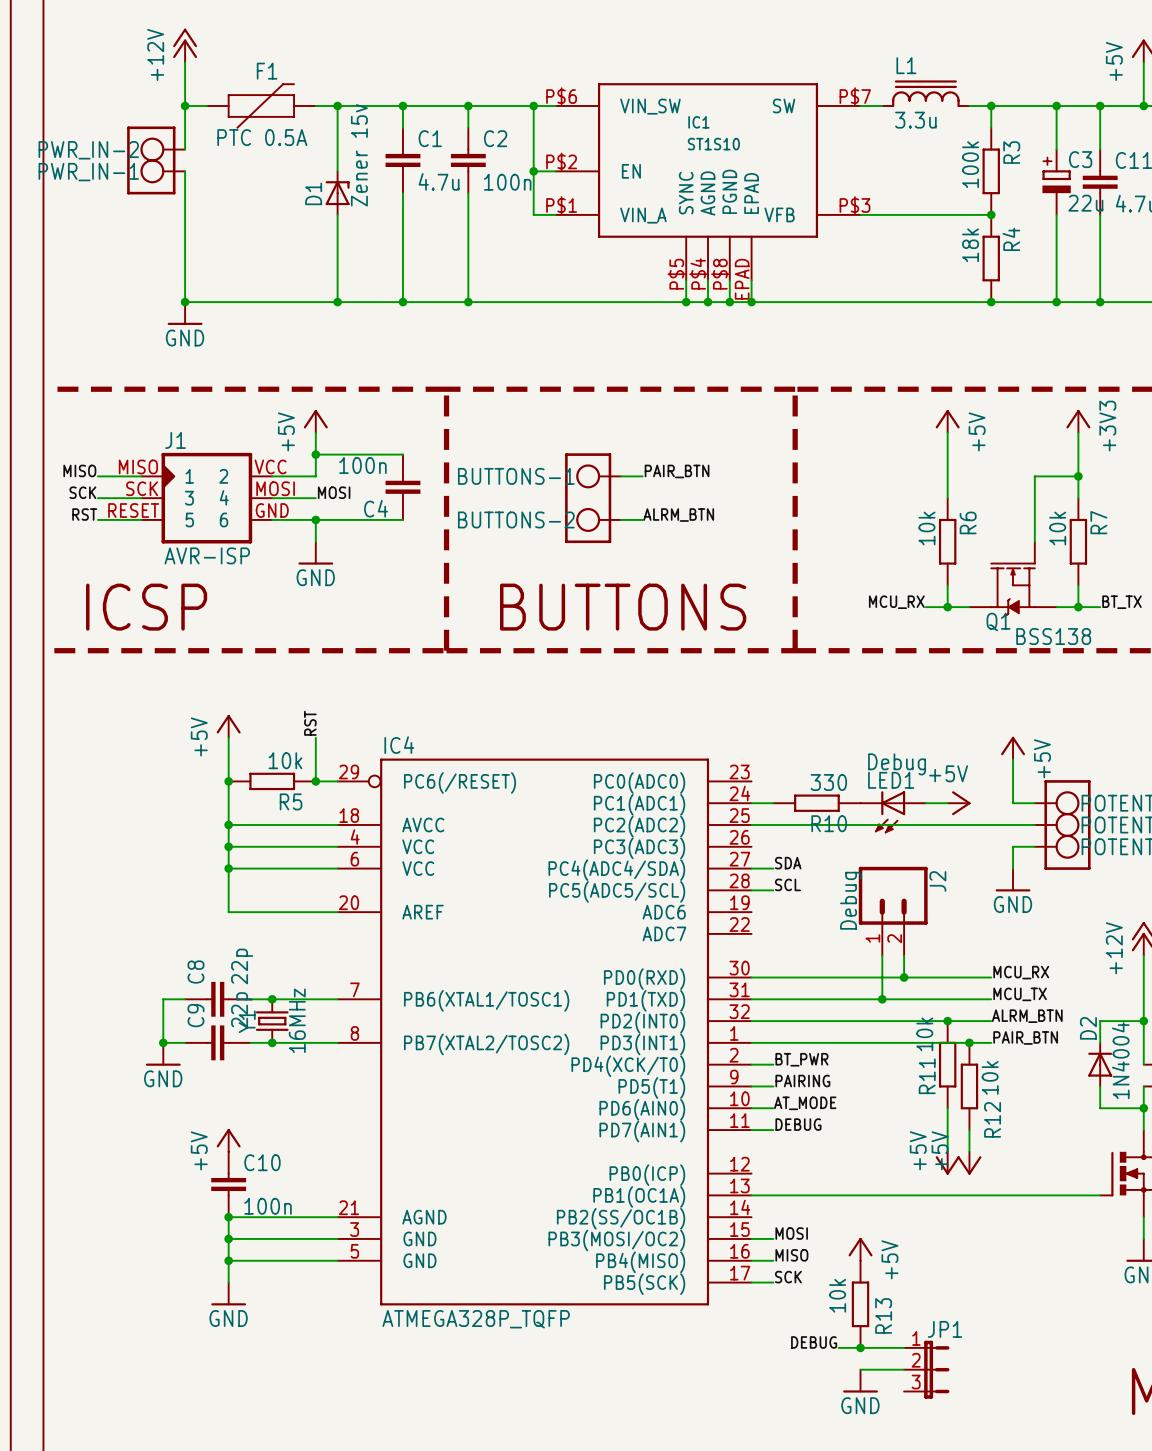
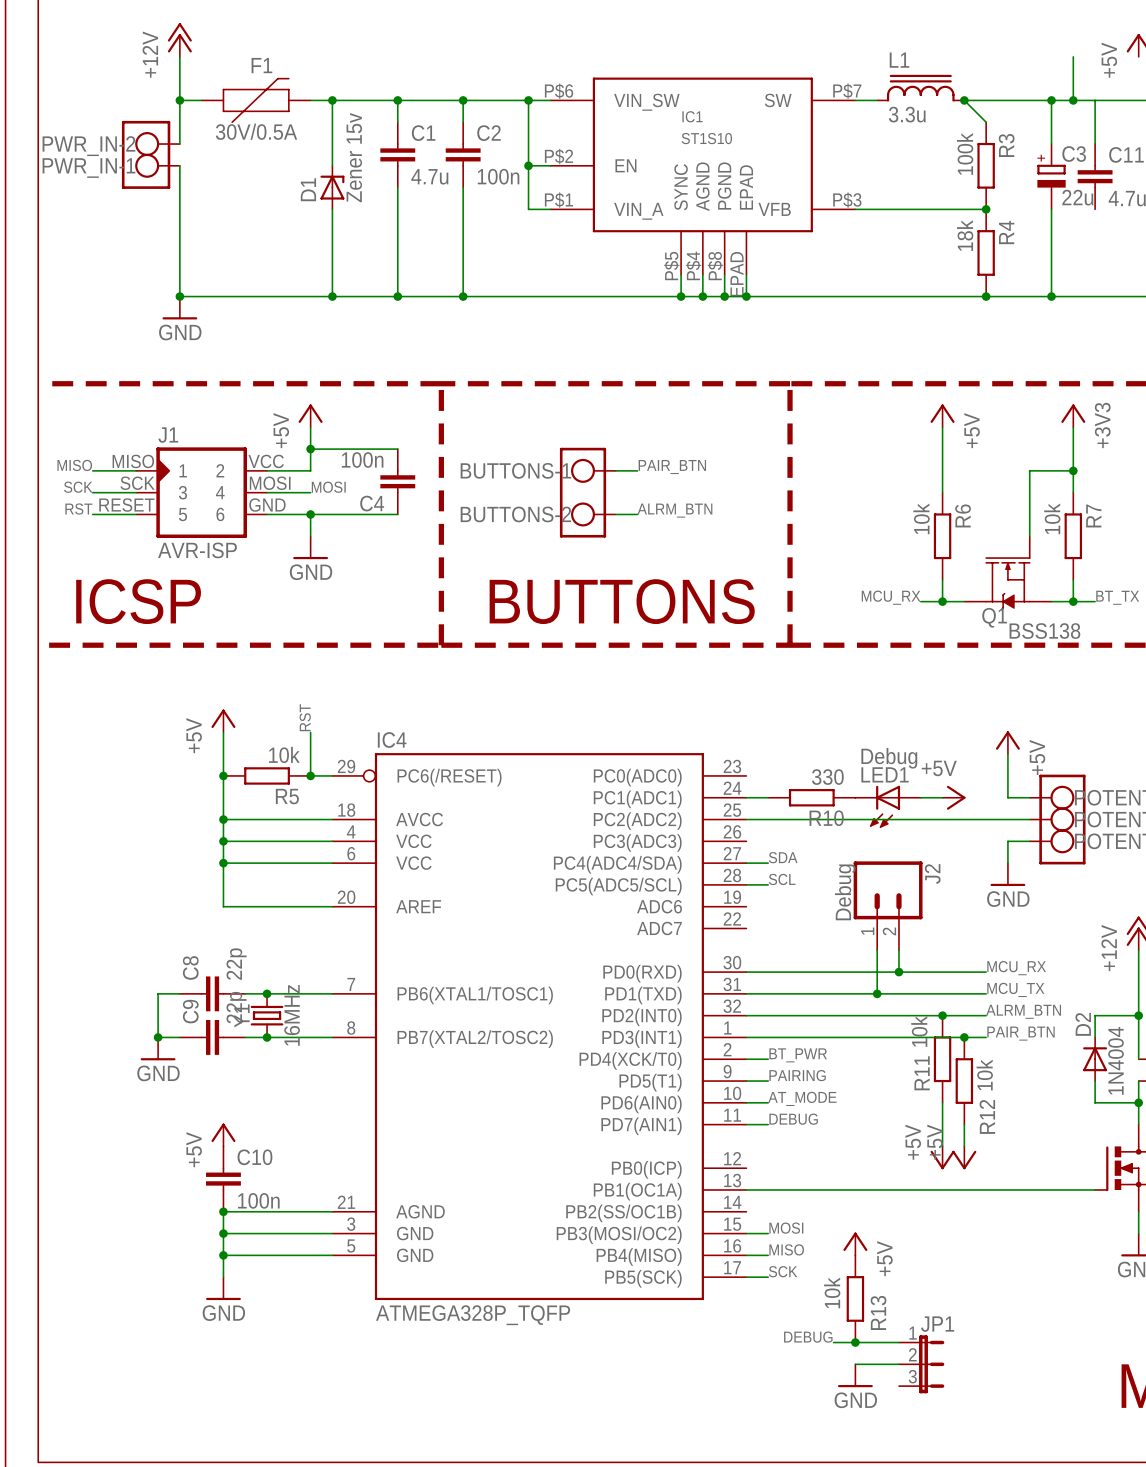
wire: (1143, 62) (1143, 105) -> (1073, 56) (1073, 100)
wire: (991, 105) (991, 127) -> (964, 100) (986, 122)
junction position: (991, 105) -> (964, 100)
junction position: (1100, 105) -> (1073, 100)
junction: (1143, 105) -> none
F1 value: PTC 0.5A (262, 137) -> 30V/0.5A (256, 131)
wire: (1100, 214) (1100, 302) -> none
junction: (1100, 302) -> none

